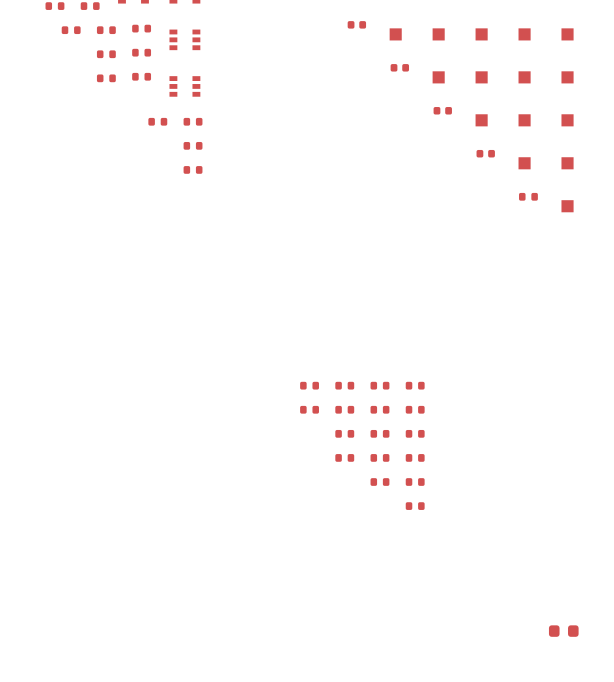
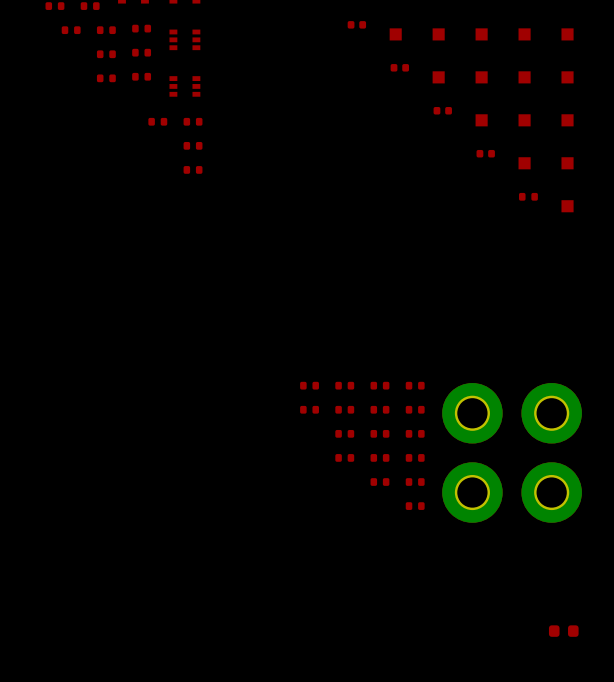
part: none -> (472, 413)
part: none -> (551, 413)
part: none -> (472, 492)
part: none -> (551, 492)

